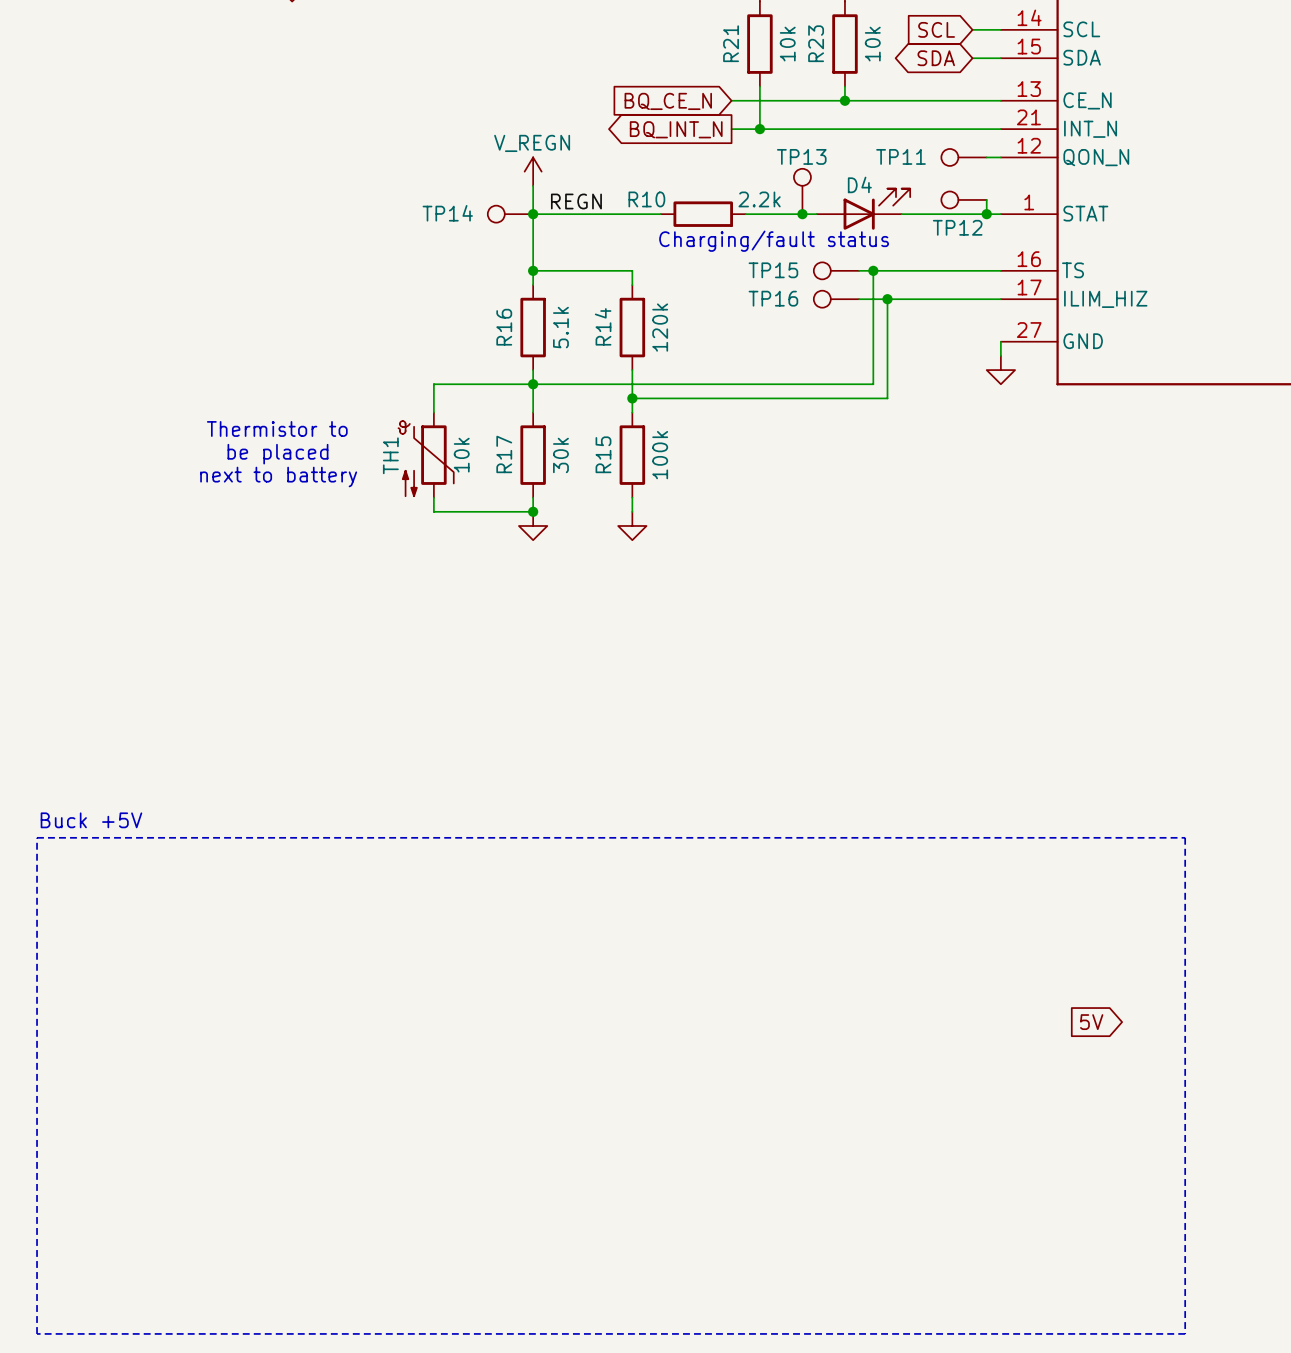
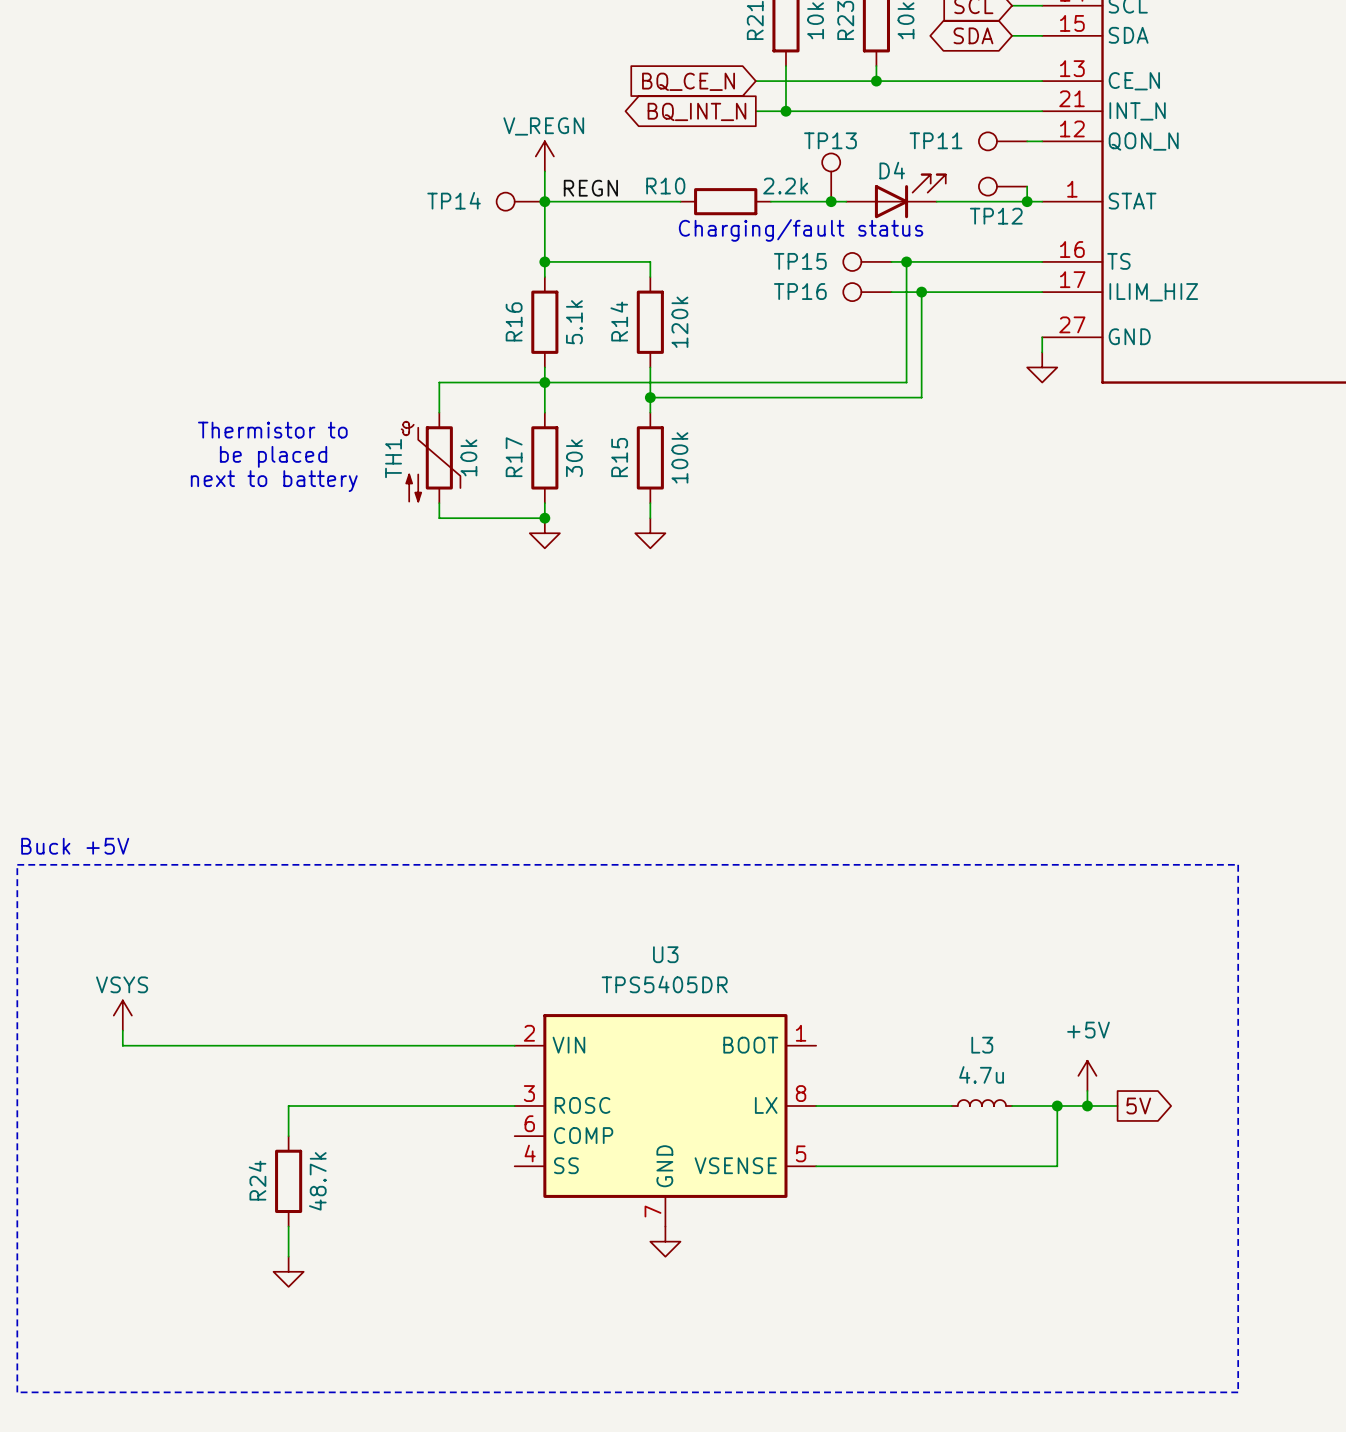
power symbol: none -> VSYS (122, 1015)
wire: none -> (122, 1030) (122, 1045) (514, 1045)
global label position: 5V (1091, 1022) -> 5V (1138, 1106)
power symbol: none -> +5V (1087, 1075)
wire: none -> (1087, 1090) (1087, 1106)
L3: none -> 4.7u (981, 1102)
wire: none -> (514, 1106) (288, 1106) (288, 1136)
wire: none -> (816, 1106) (951, 1106)
wire: none -> (1012, 1106) (1117, 1106)
wire: none -> (1057, 1106) (1057, 1166) (816, 1166)
junction: none -> (1057, 1106)
junction: none -> (1087, 1106)
U3: none -> TPS5405DR (665, 1120)
R24: none -> 48.7k (288, 1181)
wire: none -> (288, 1226) (288, 1256)
power symbol: none -> (665, 1241)
power symbol: none -> (288, 1271)

